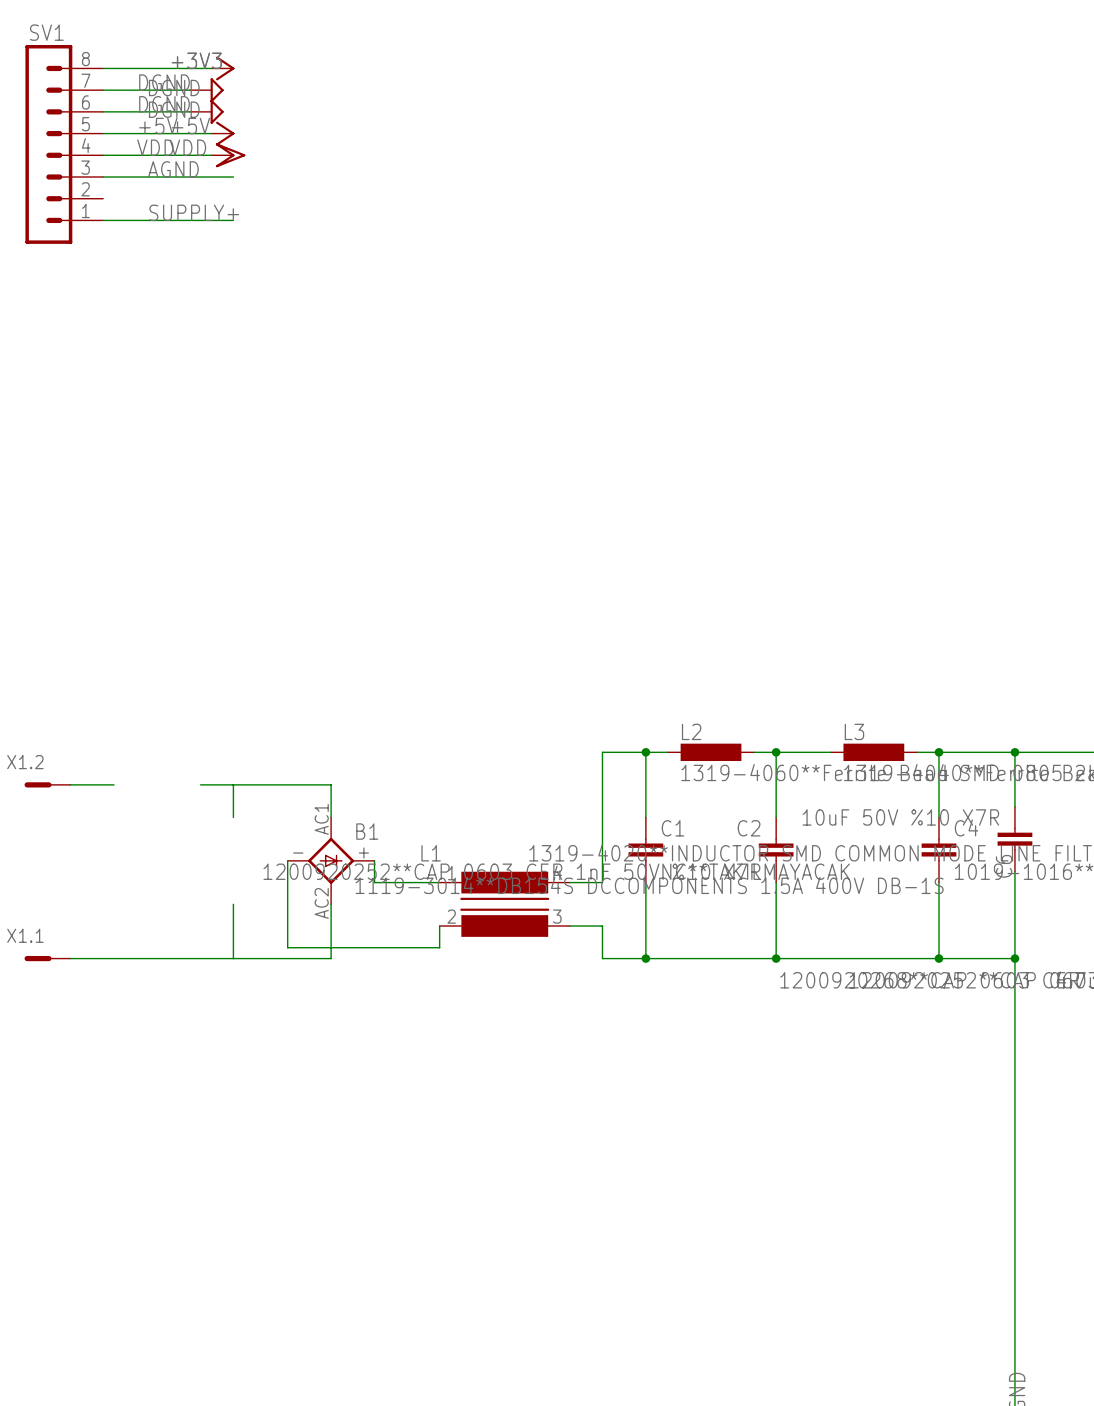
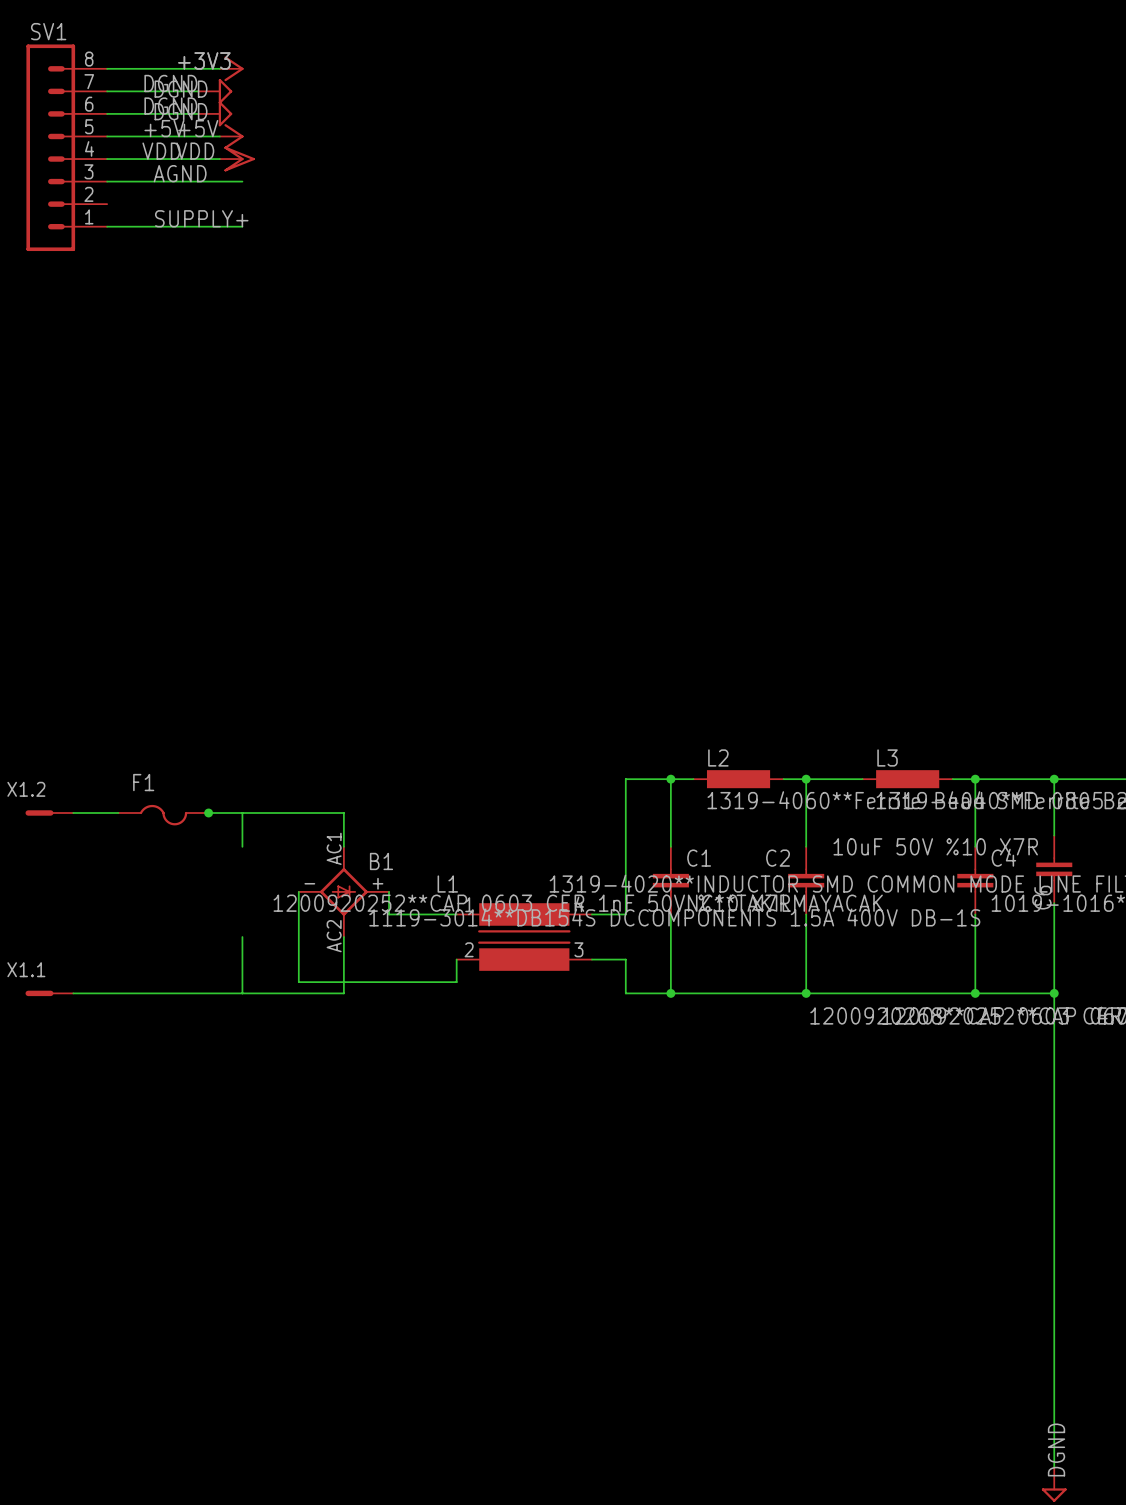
junction: none -> (208, 812)
F1: none -> (163, 815)

